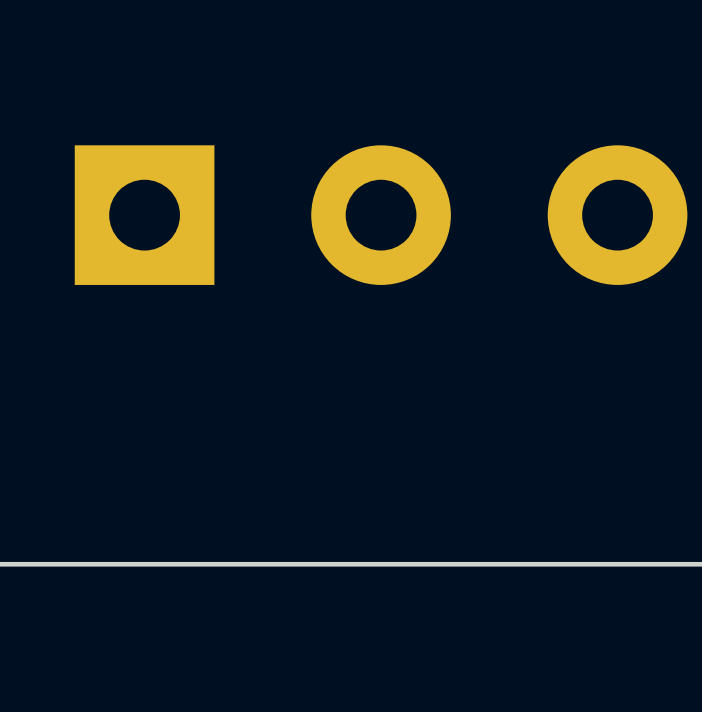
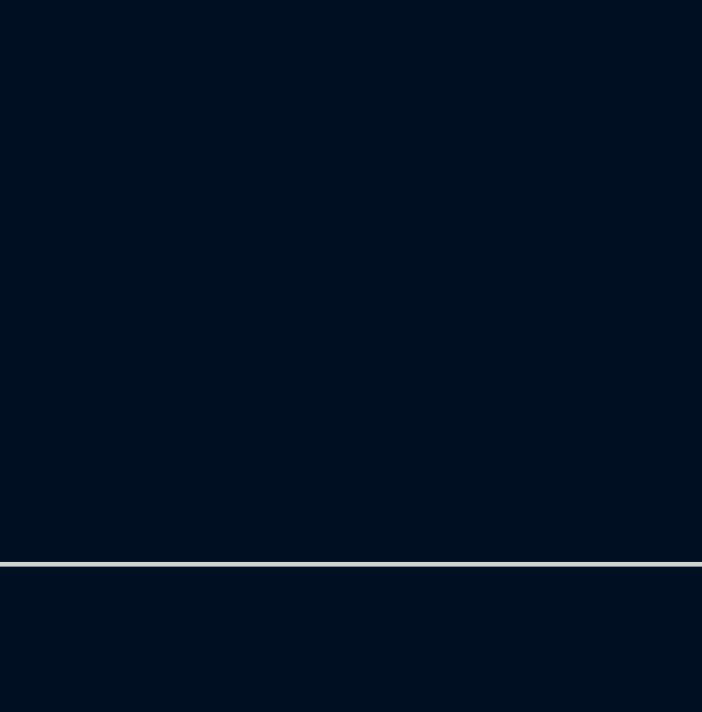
part: (381, 215) -> none

